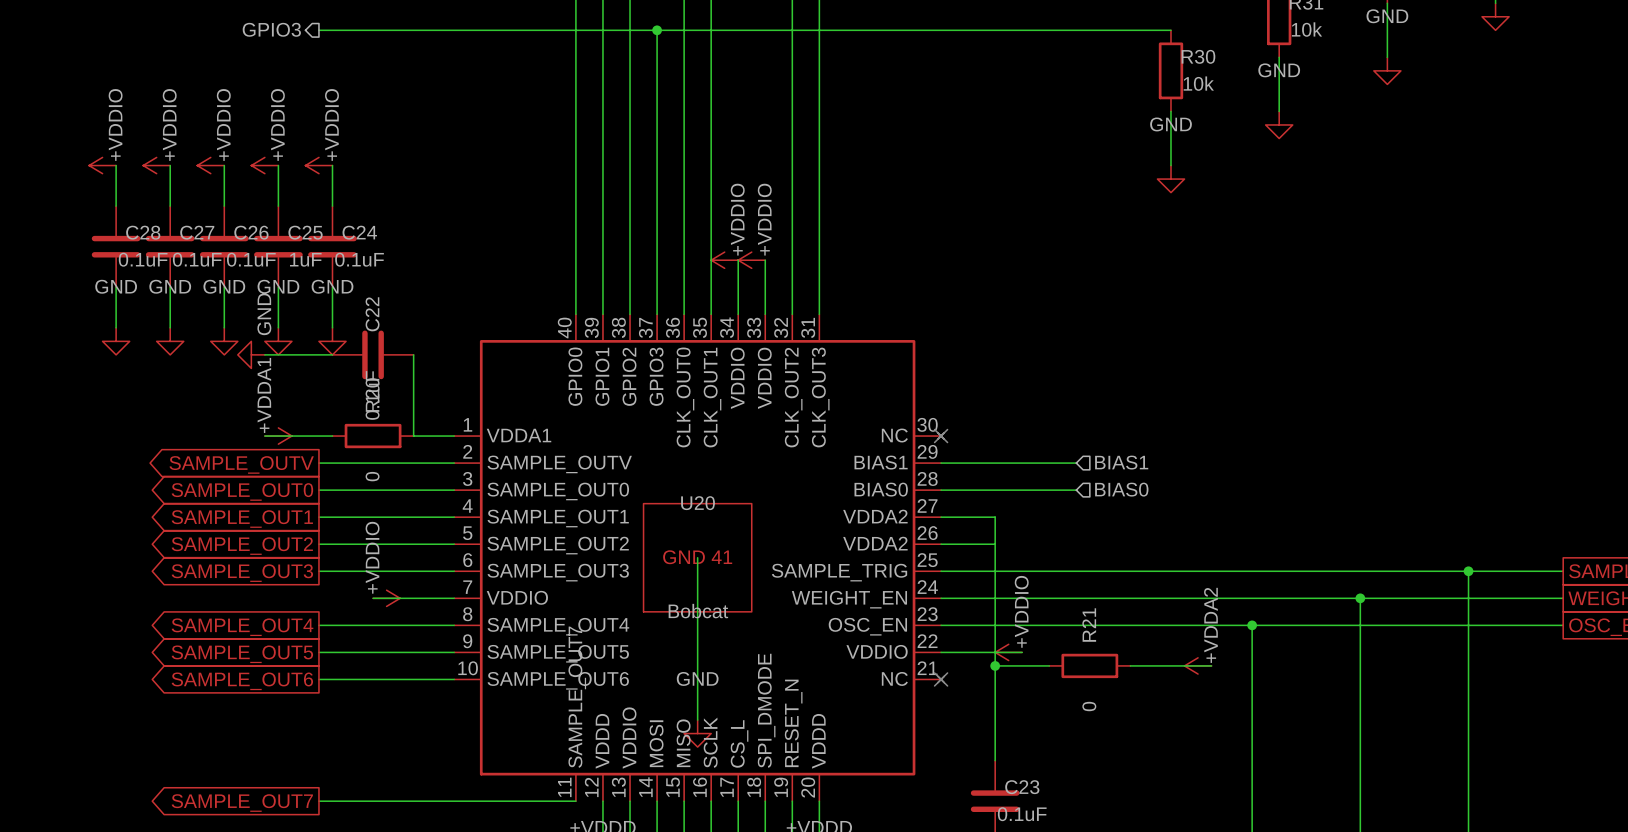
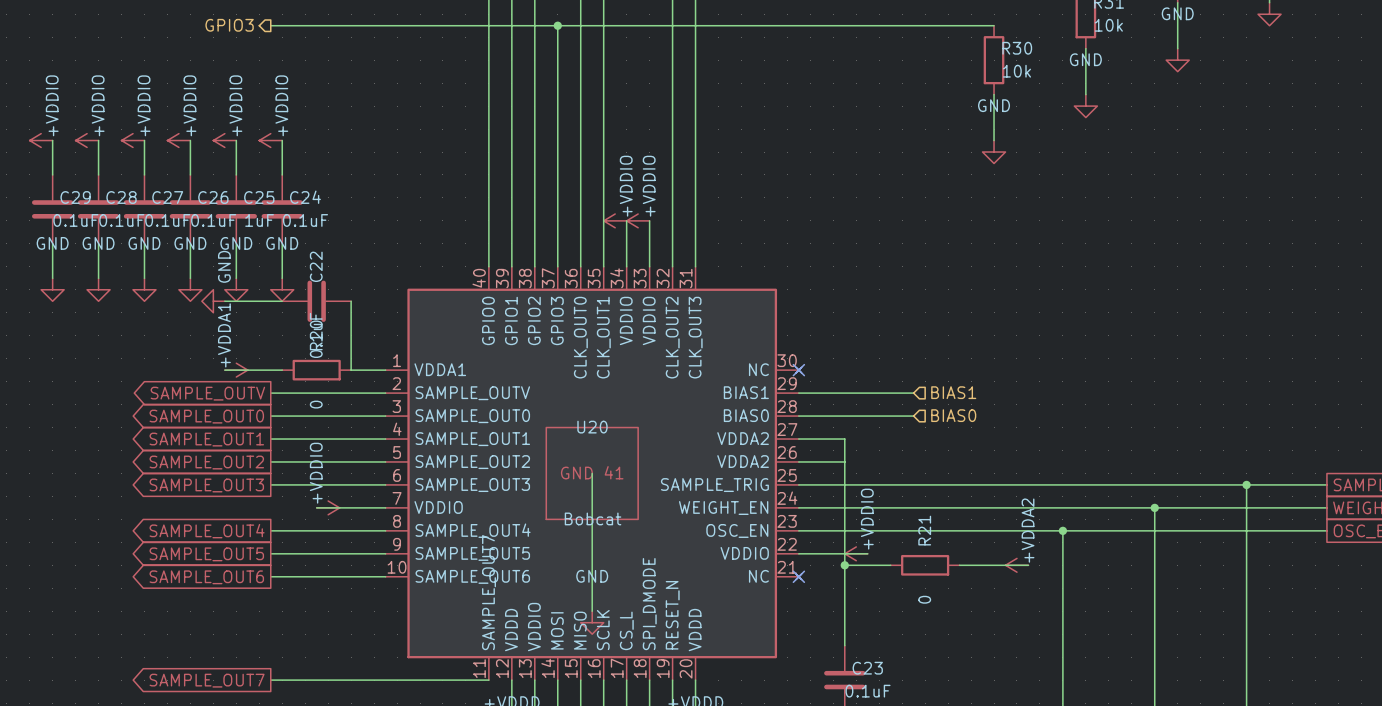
power symbol: none -> +VDDIO (41, 140)
wire: none -> (52, 140) (52, 174)
C29: none -> 0.1uF (52, 209)
wire: none -> (52, 243) (52, 278)
power symbol: none -> GND (52, 289)

